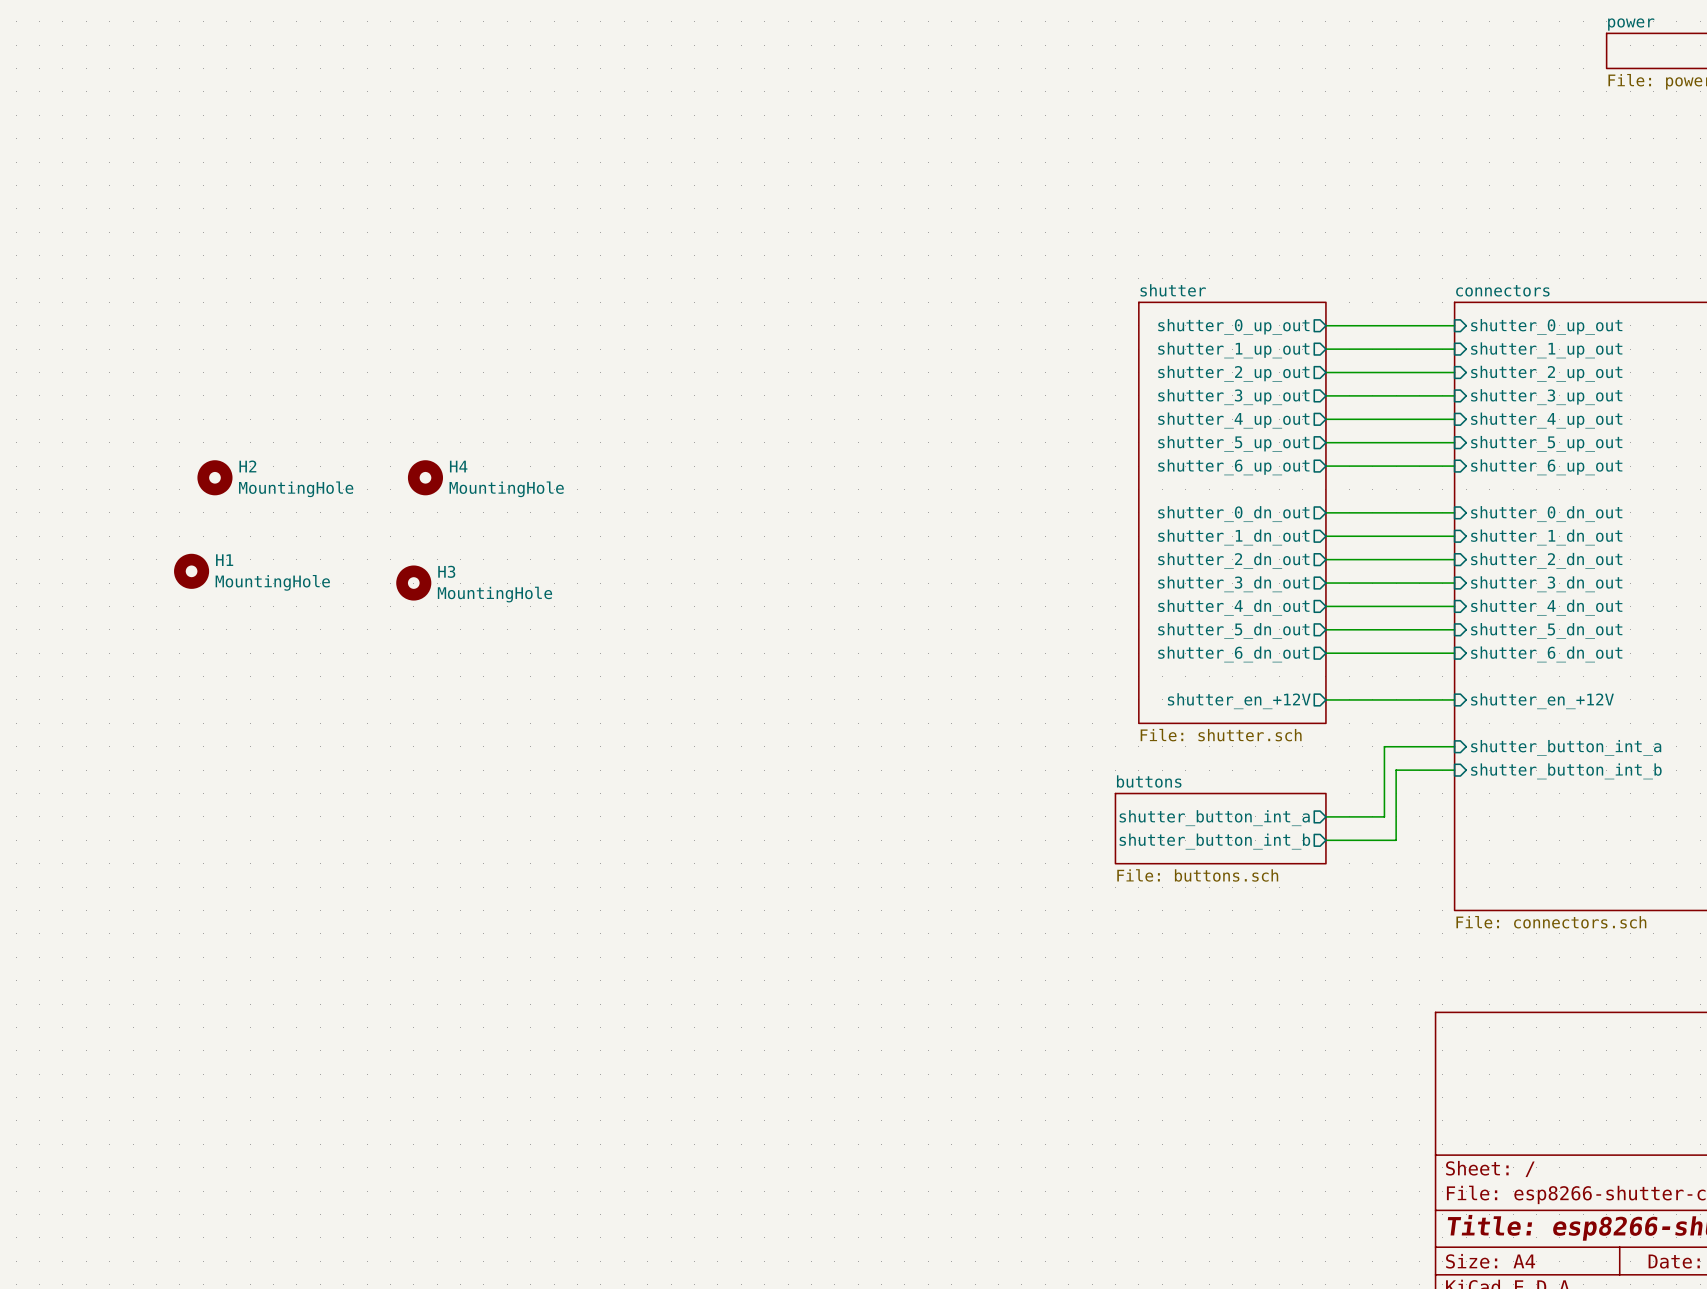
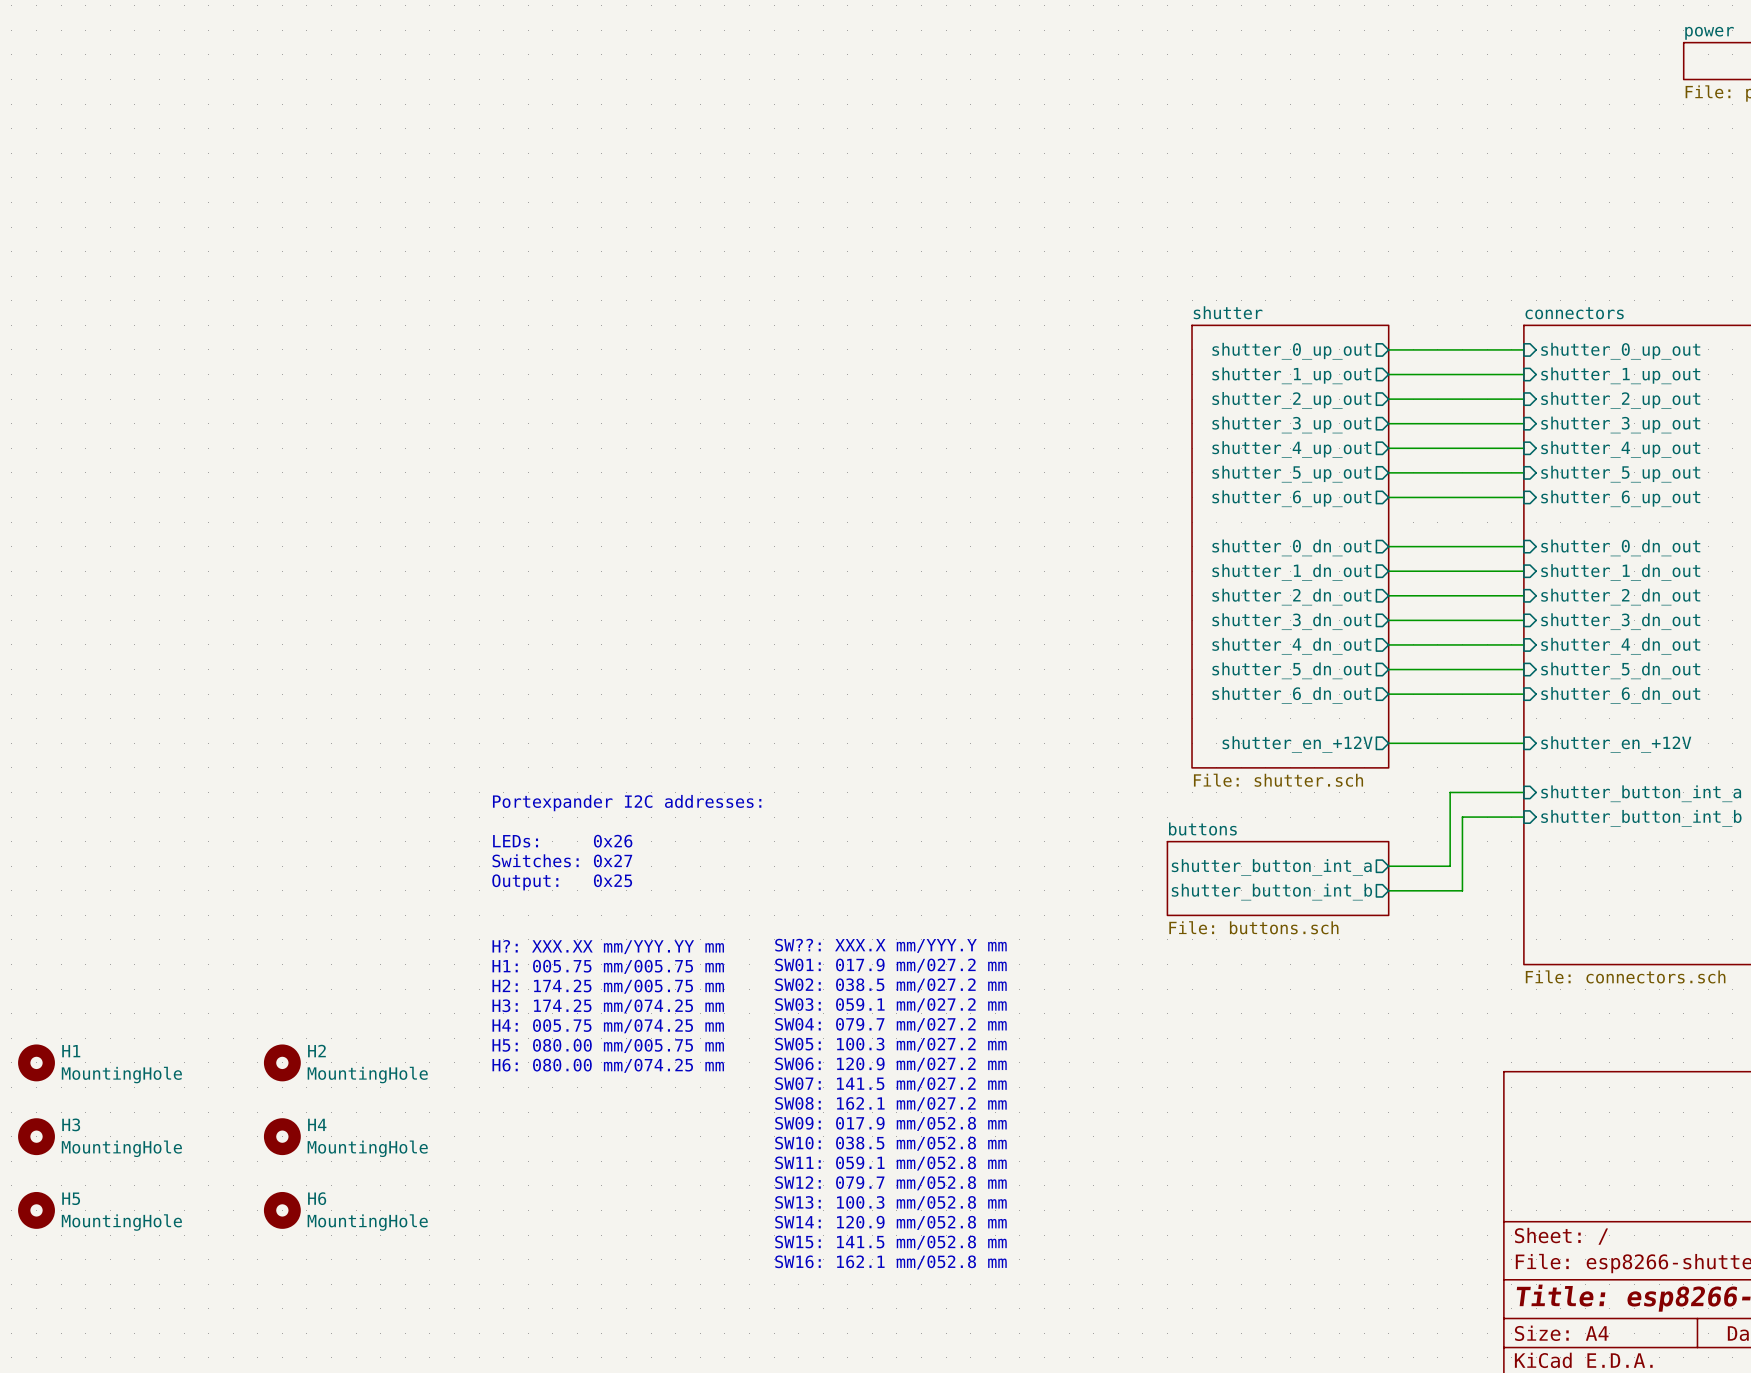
H2 position: (214, 477) -> (282, 1062)
H4 position: (425, 477) -> (282, 1136)
H1 position: (191, 571) -> (36, 1062)
H3 position: (413, 583) -> (36, 1136)
text: none -> Portexpander I2C addresses: (627, 803)
text: none -> LEDs: 0x26 (562, 841)
text: none -> Switches: 0x27 (562, 860)
text: none -> Output: 0x25 (562, 882)
text: none -> SW??: XXX.X mm/YYY.Y mm (890, 945)
text: none -> H?: XXX.XX mm/YYY.YY mm (608, 947)
text: none -> SW01: 017.9 mm/027.2 mm (890, 965)
text: none -> H1: 005.75 mm/005.75 mm (608, 966)
text: none -> SW02: 038.5 mm/027.2 mm (890, 985)
text: none -> H2: 174.25 mm/005.75 mm (608, 986)
text: none -> SW03: 059.1 mm/027.2 mm (890, 1005)
text: none -> H3: 174.25 mm/074.25 mm (608, 1006)
text: none -> SW04: 079.7 mm/027.2 mm (890, 1024)
text: none -> H4: 005.75 mm/074.25 mm (608, 1026)
text: none -> SW05: 100.3 mm/027.2 mm (890, 1044)
text: none -> H5: 080.00 mm/005.75 mm (608, 1046)
text: none -> SW06: 120.9 mm/027.2 mm (890, 1064)
text: none -> H6: 080.00 mm/074.25 mm (608, 1065)
text: none -> SW07: 141.5 mm/027.2 mm (890, 1084)
text: none -> SW08: 162.1 mm/027.2 mm (890, 1104)
text: none -> SW09: 017.9 mm/052.8 mm (890, 1123)
text: none -> SW10: 038.5 mm/052.8 mm (890, 1143)
text: none -> SW11: 059.1 mm/052.8 mm (890, 1163)
text: none -> SW12: 079.7 mm/052.8 mm (890, 1183)
text: none -> SW13: 100.3 mm/052.8 mm (890, 1203)
H5: none -> MountingHole (36, 1210)
H6: none -> MountingHole (282, 1210)
text: none -> SW14: 120.9 mm/052.8 mm (890, 1222)
text: none -> SW15: 141.5 mm/052.8 mm (890, 1242)
text: none -> SW16: 162.1 mm/052.8 mm (890, 1262)

